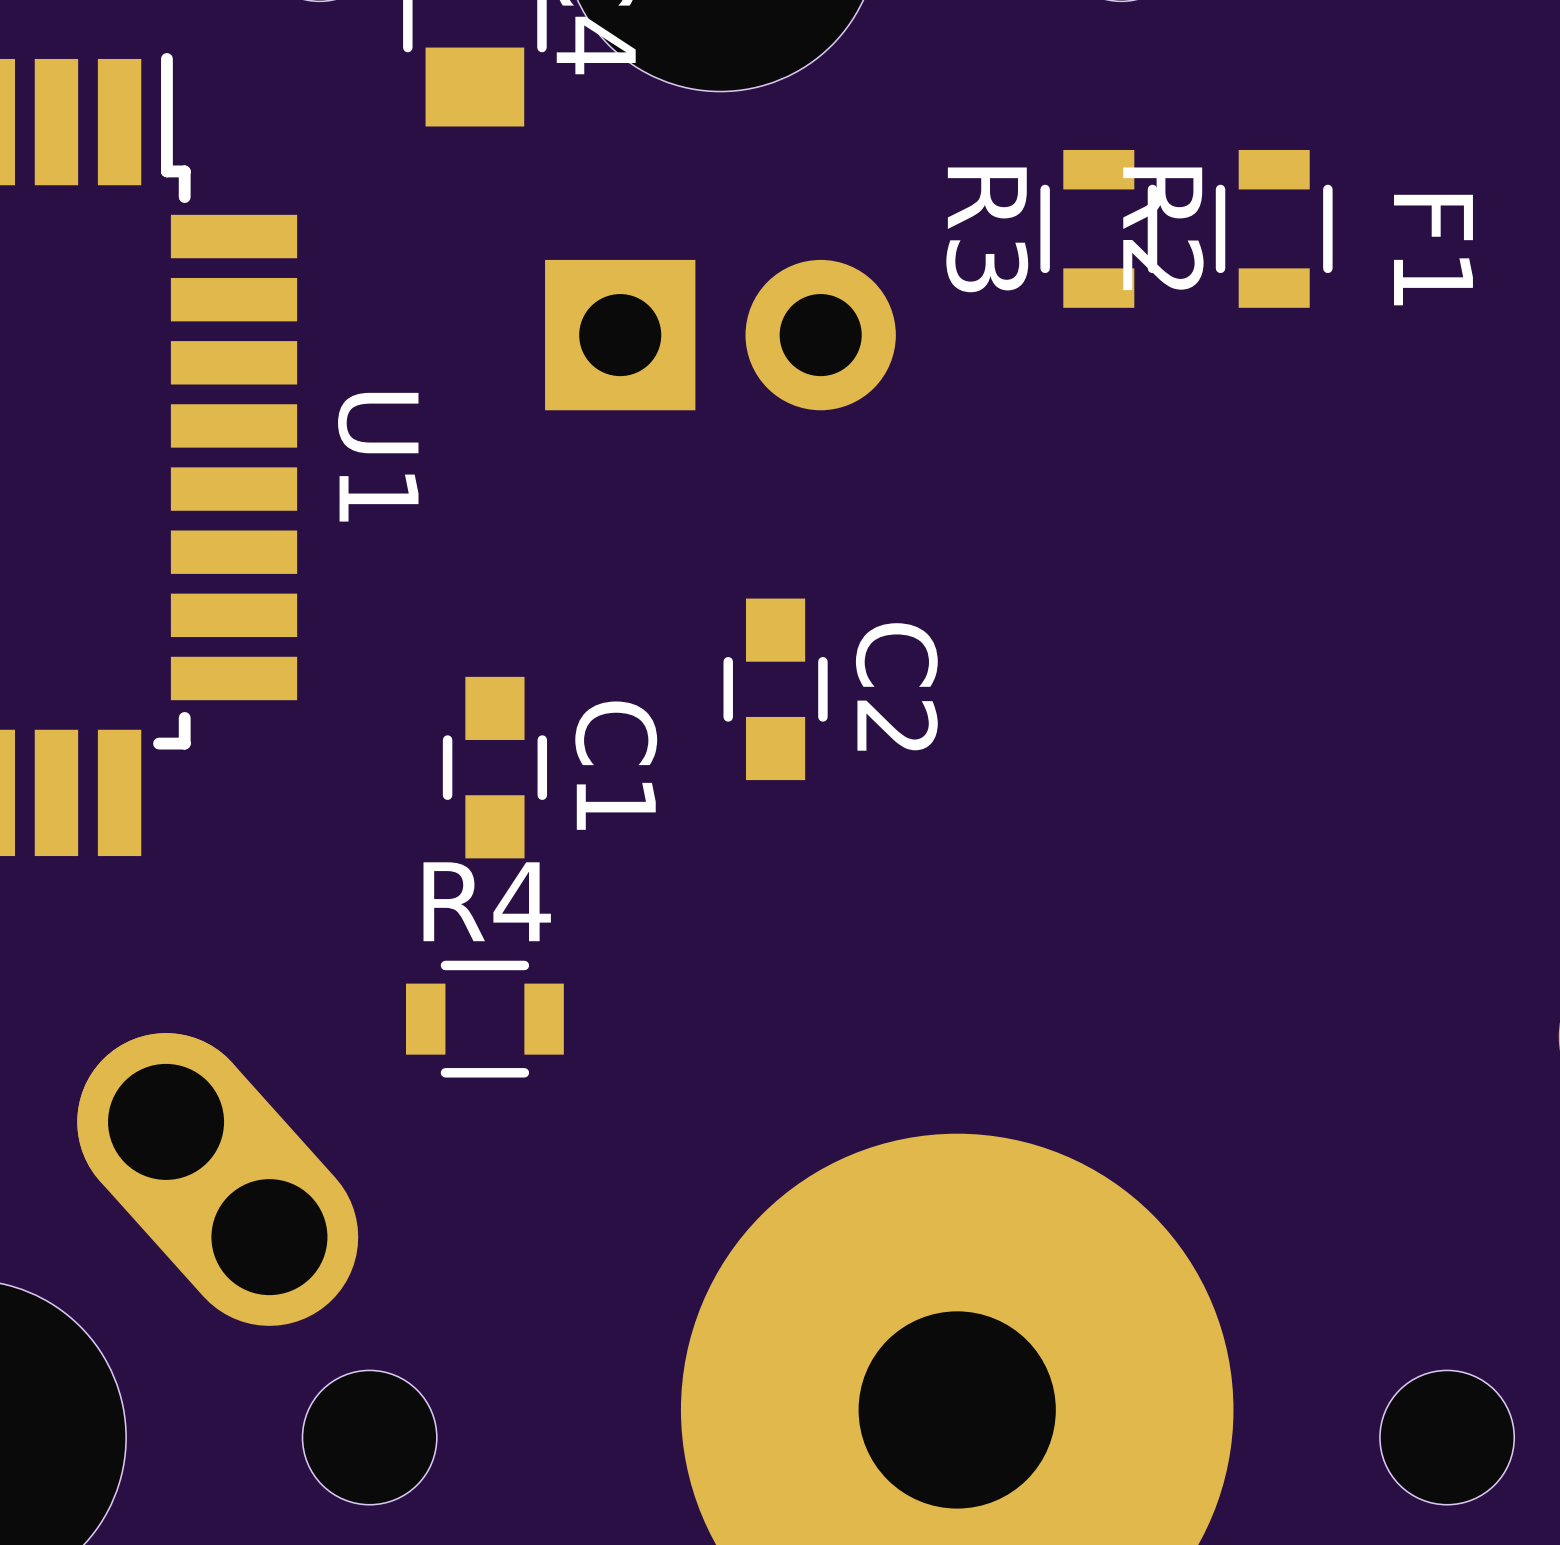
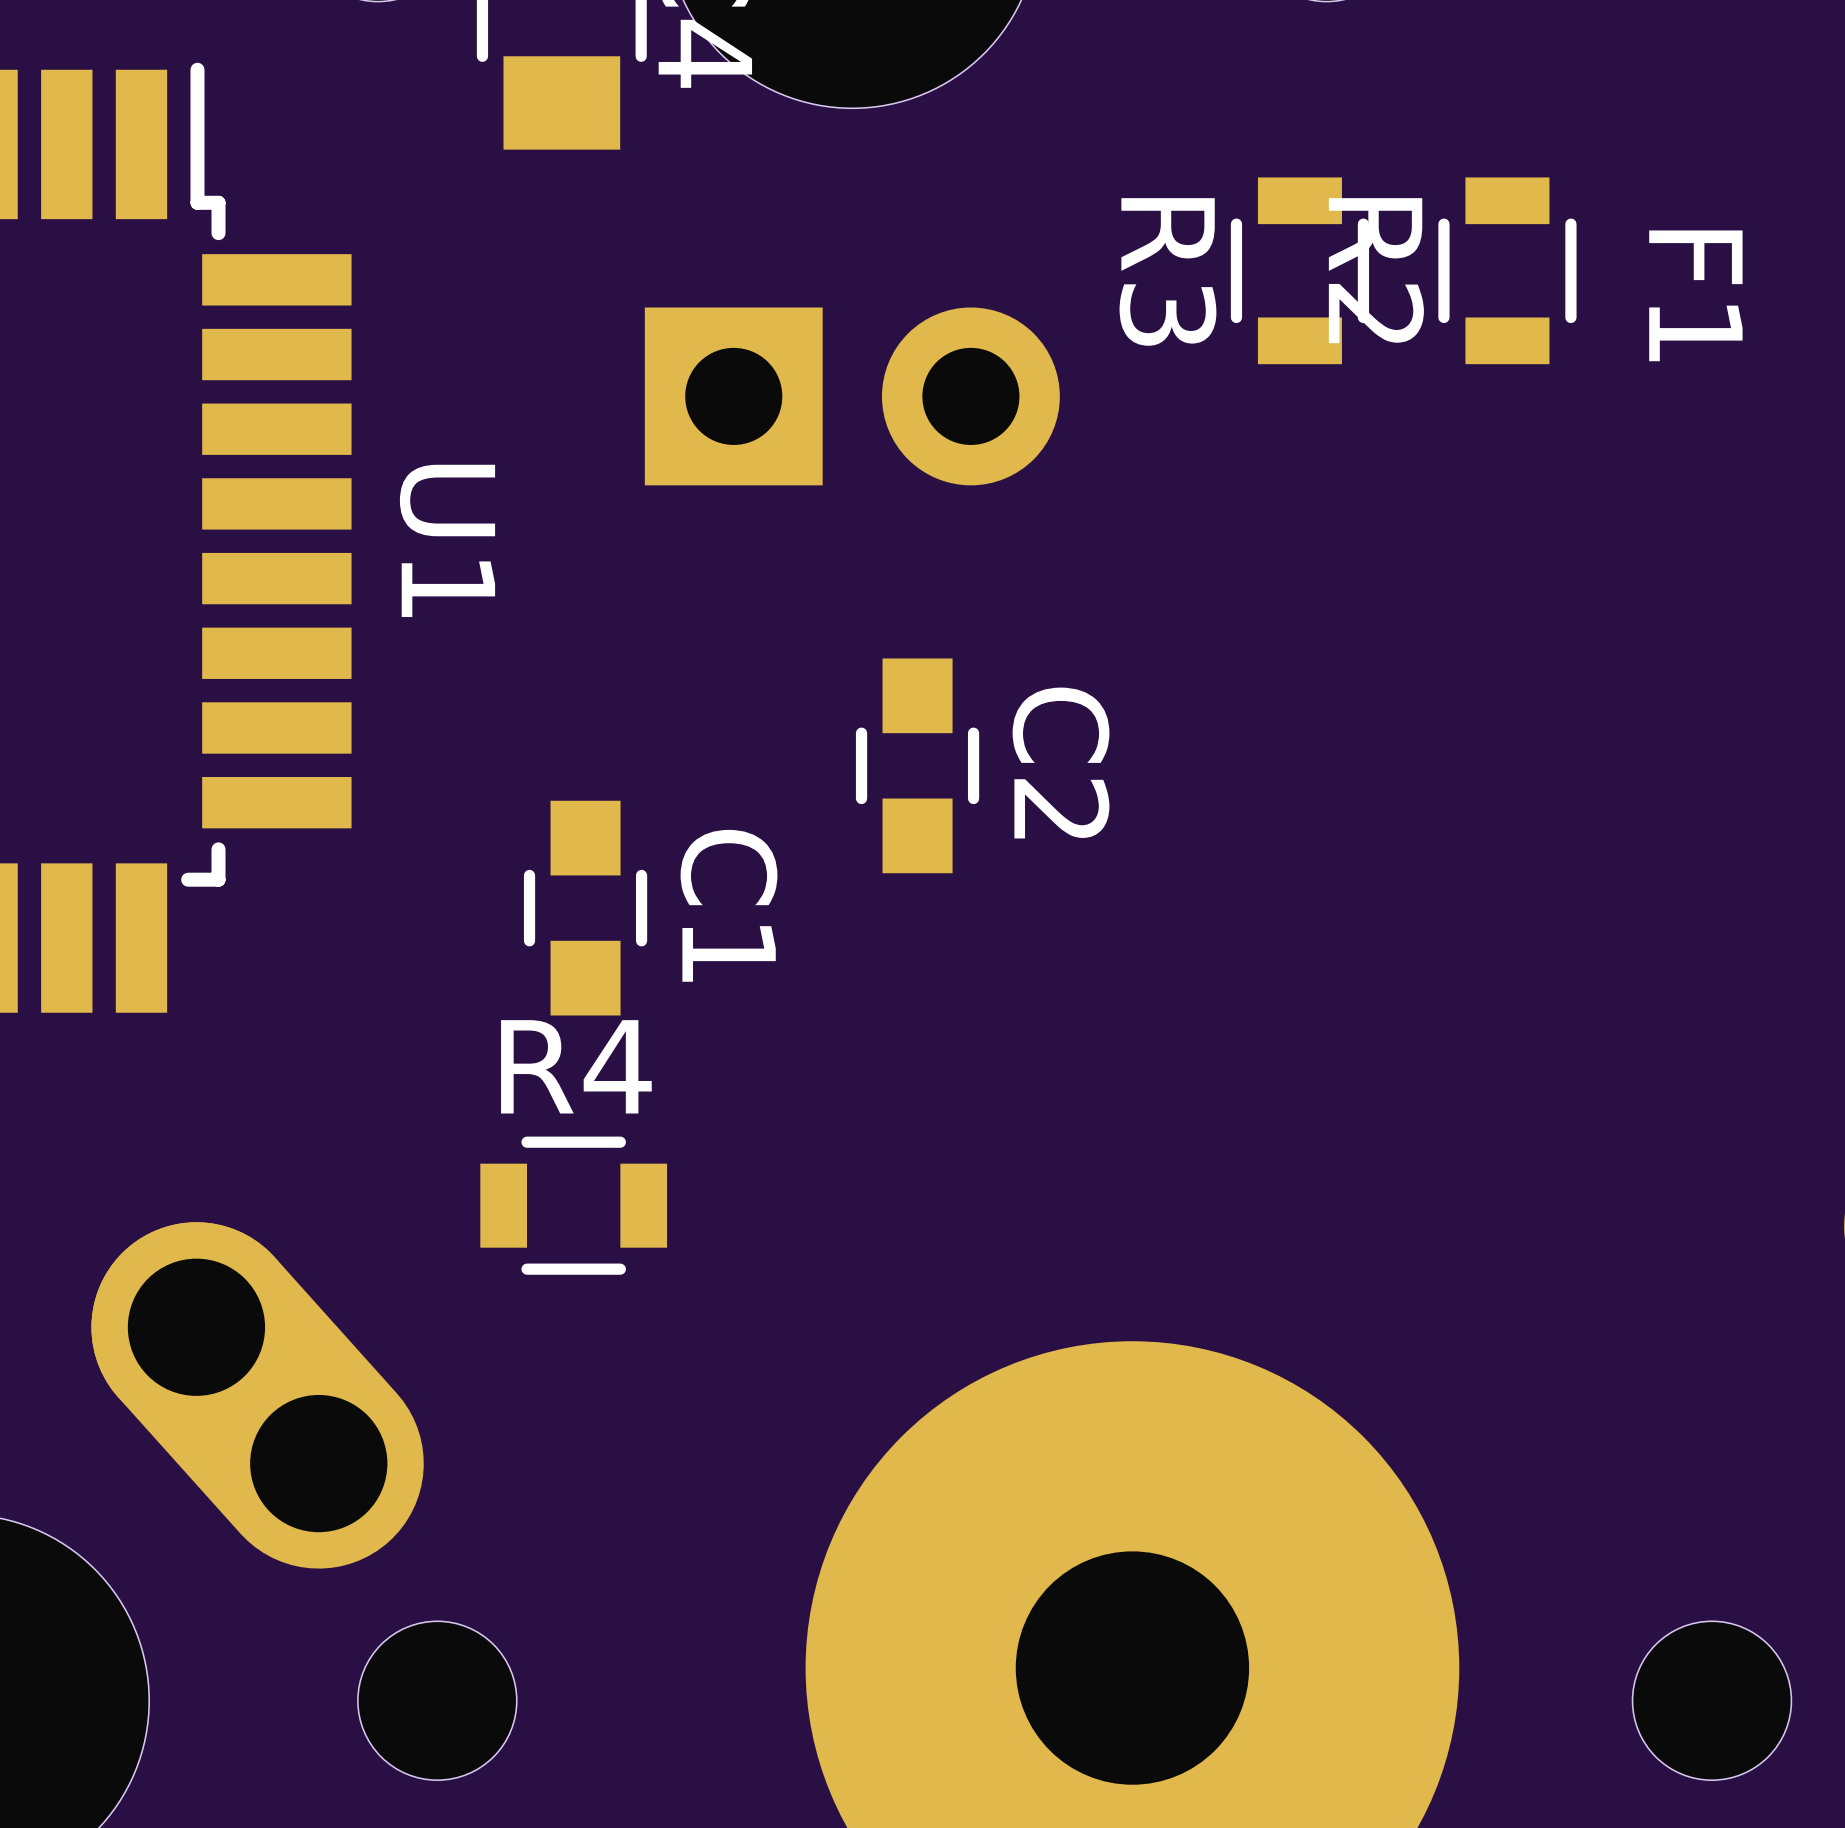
C2 position: (775, 689) -> (917, 765)

